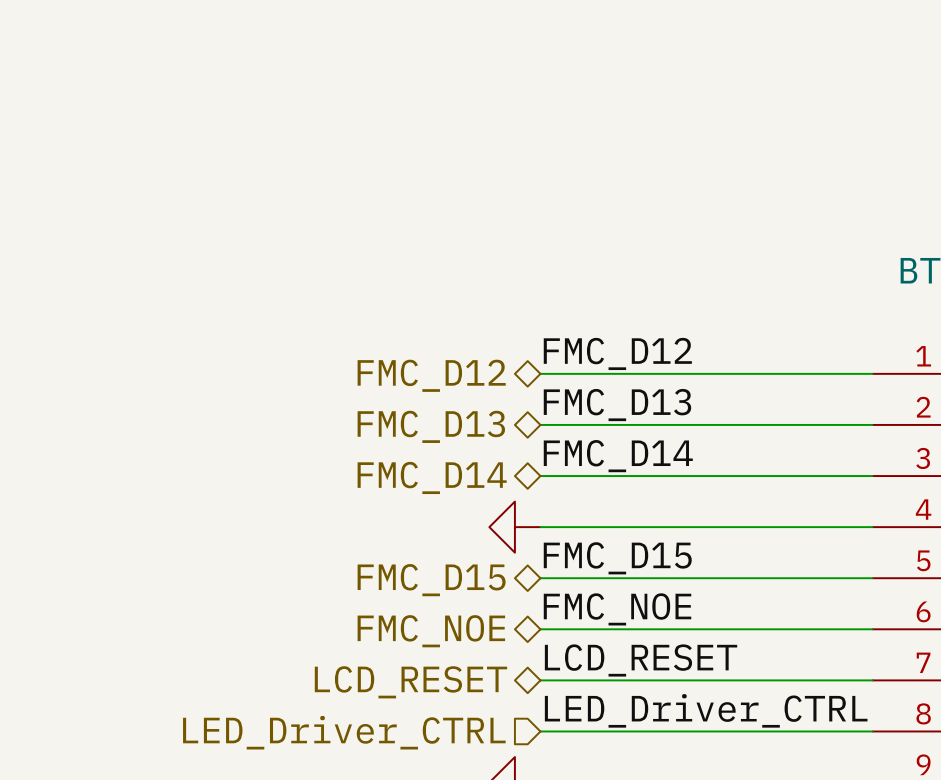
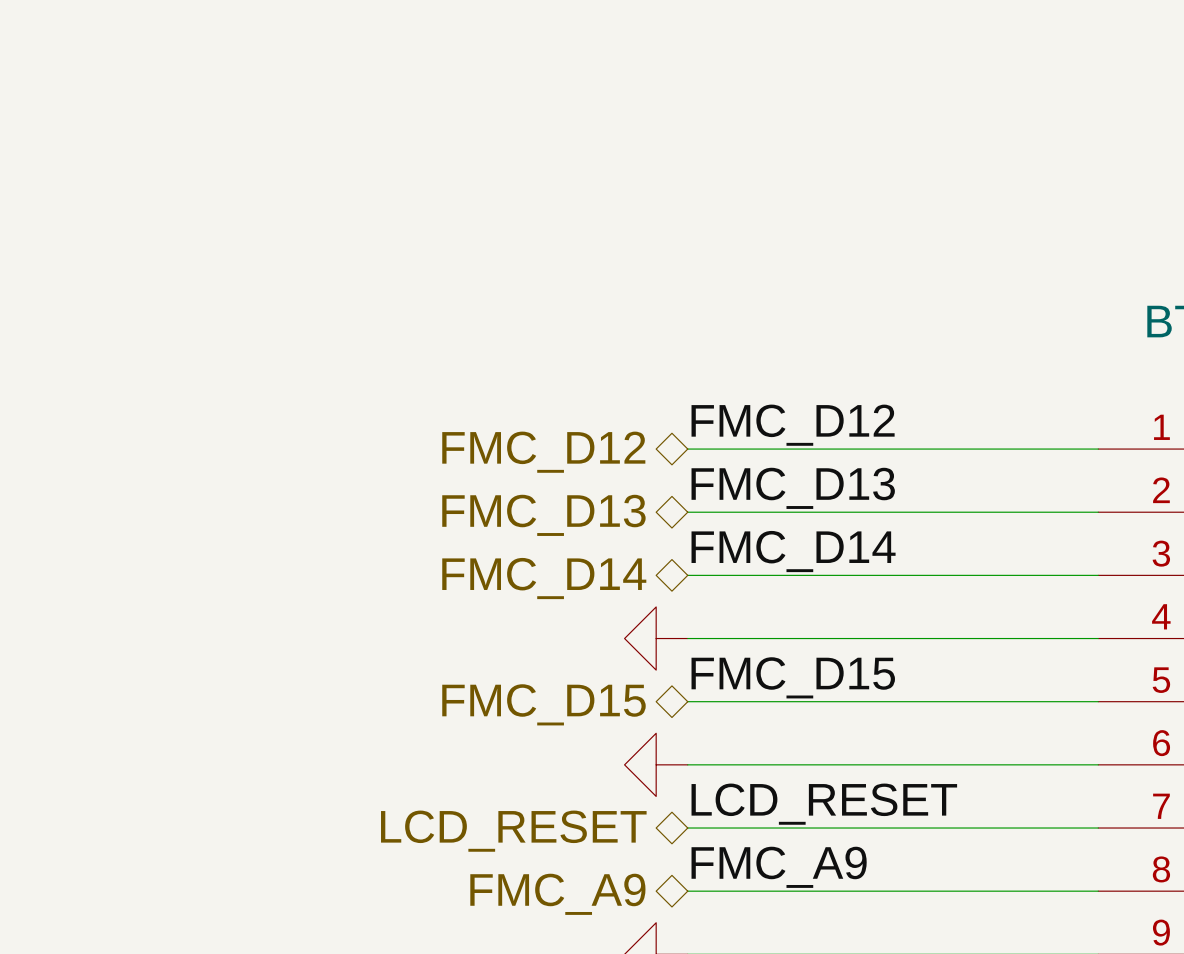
label: FMC_NOE (617, 609) -> none
power symbol: none -> (656, 764)
hierarchical label: FMC_NOE (431, 631) -> none
label: LED_Driver_CTRL (706, 710) -> FMC_A9 (779, 867)
hierarchical label shape: input (344, 732) -> bidirectional (557, 894)
hierarchical label: LED_Driver_CTRL (344, 732) -> FMC_A9 (557, 894)

